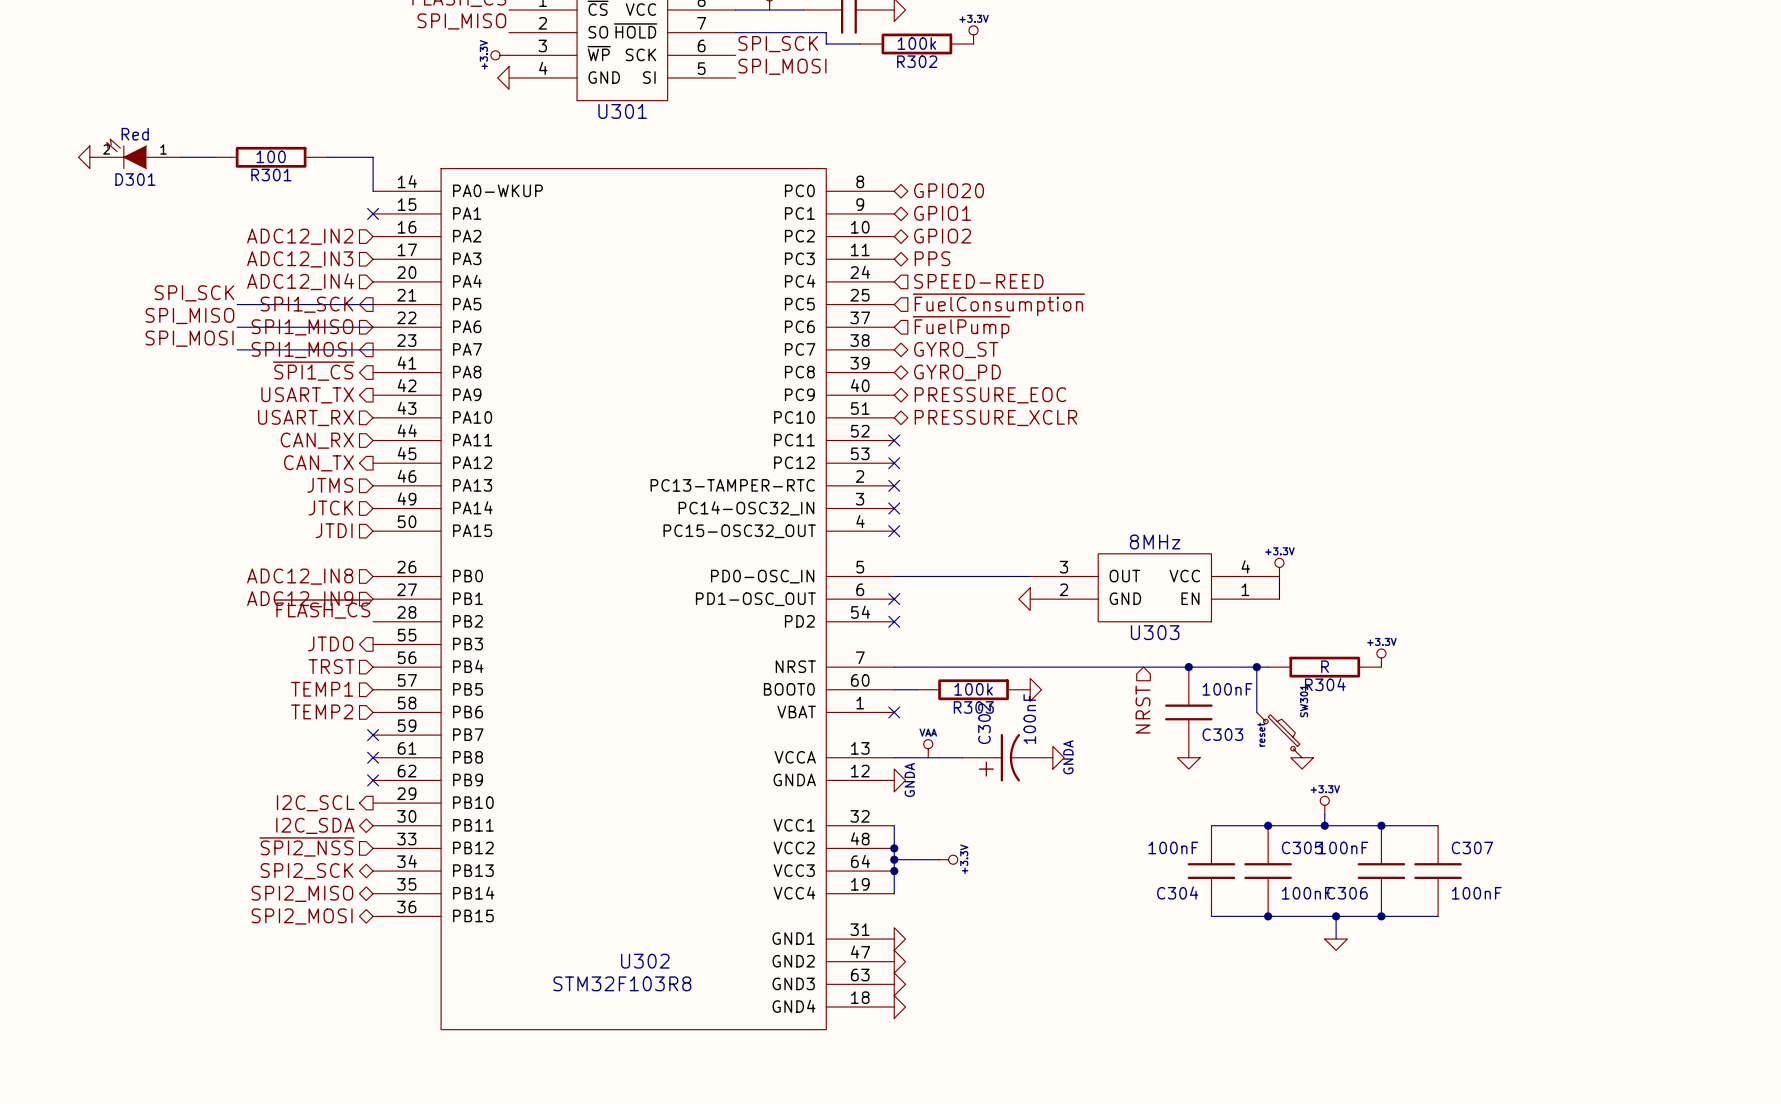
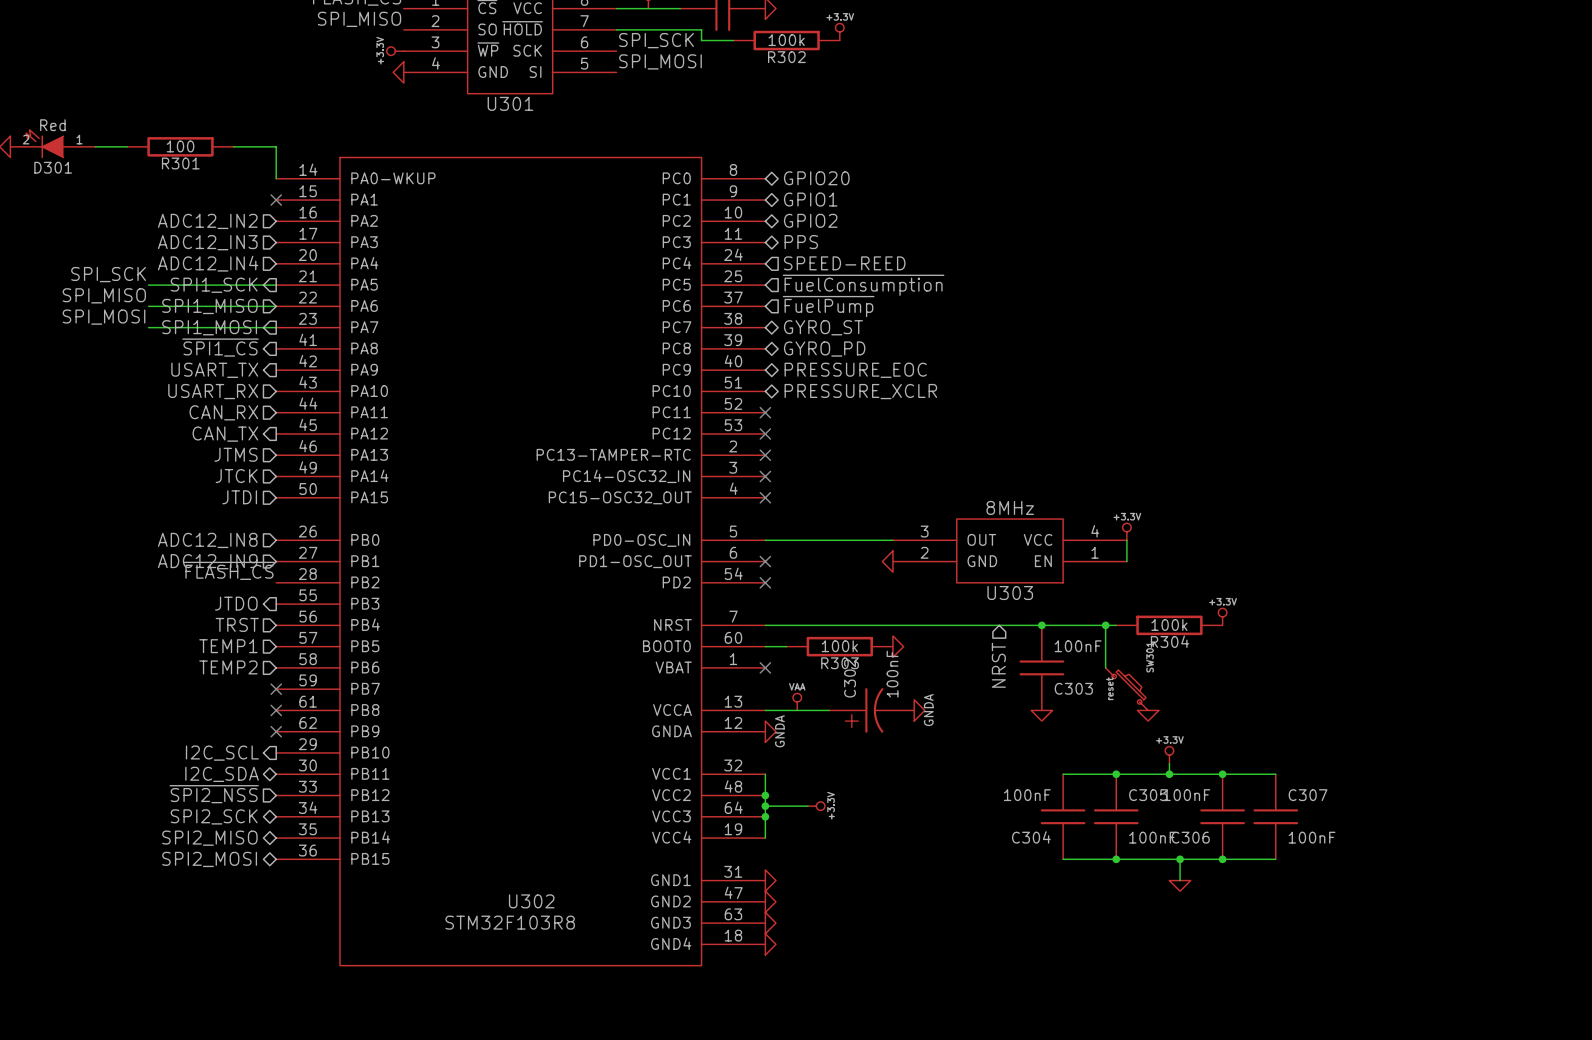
R304 value: R (1325, 666) -> 100k (1169, 624)

